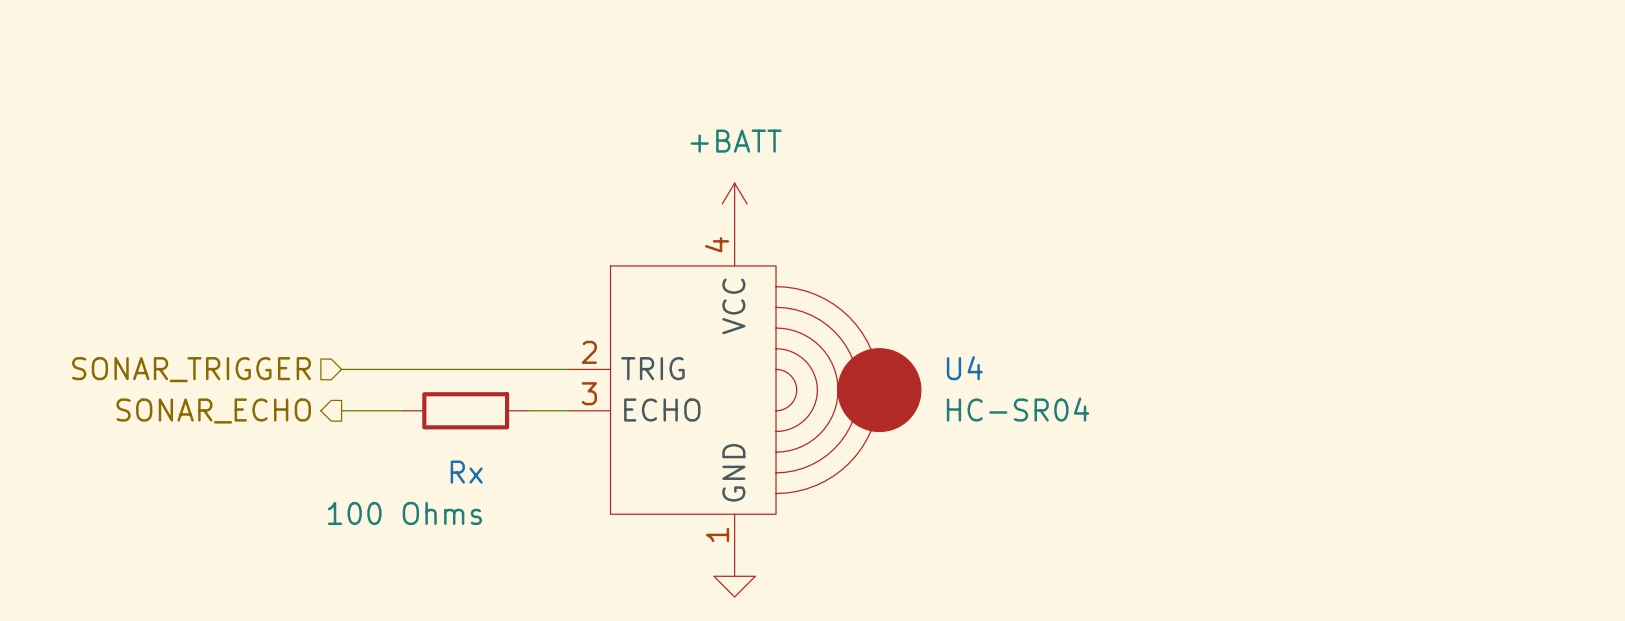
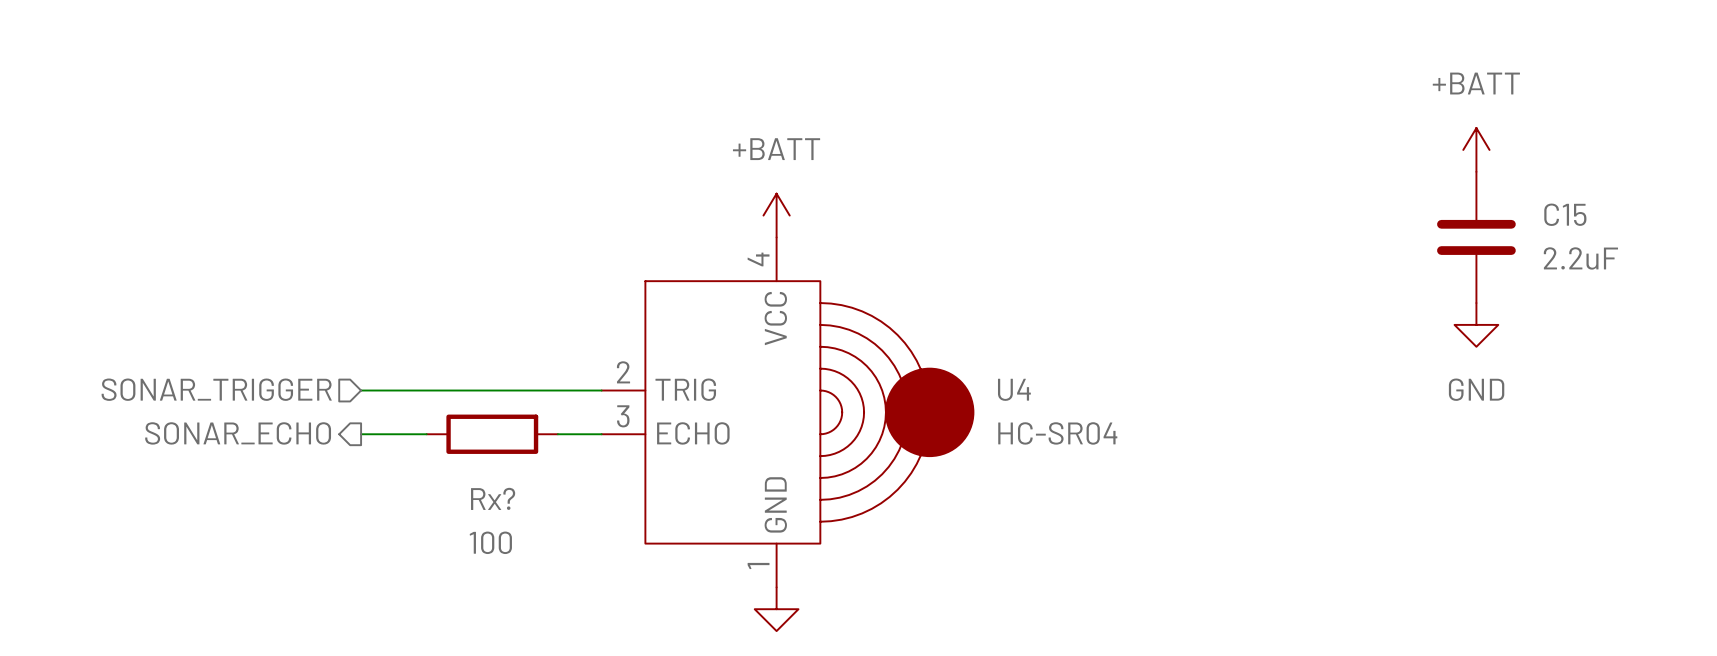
power symbol: none -> +BATT (1476, 149)
C15: none -> 2.2uF (1476, 237)
power symbol: none -> GND (1476, 324)
Rx name: Rx (466, 472) -> Rx? (493, 498)
Rx value: 100 Ohms (404, 513) -> 100 (490, 542)

